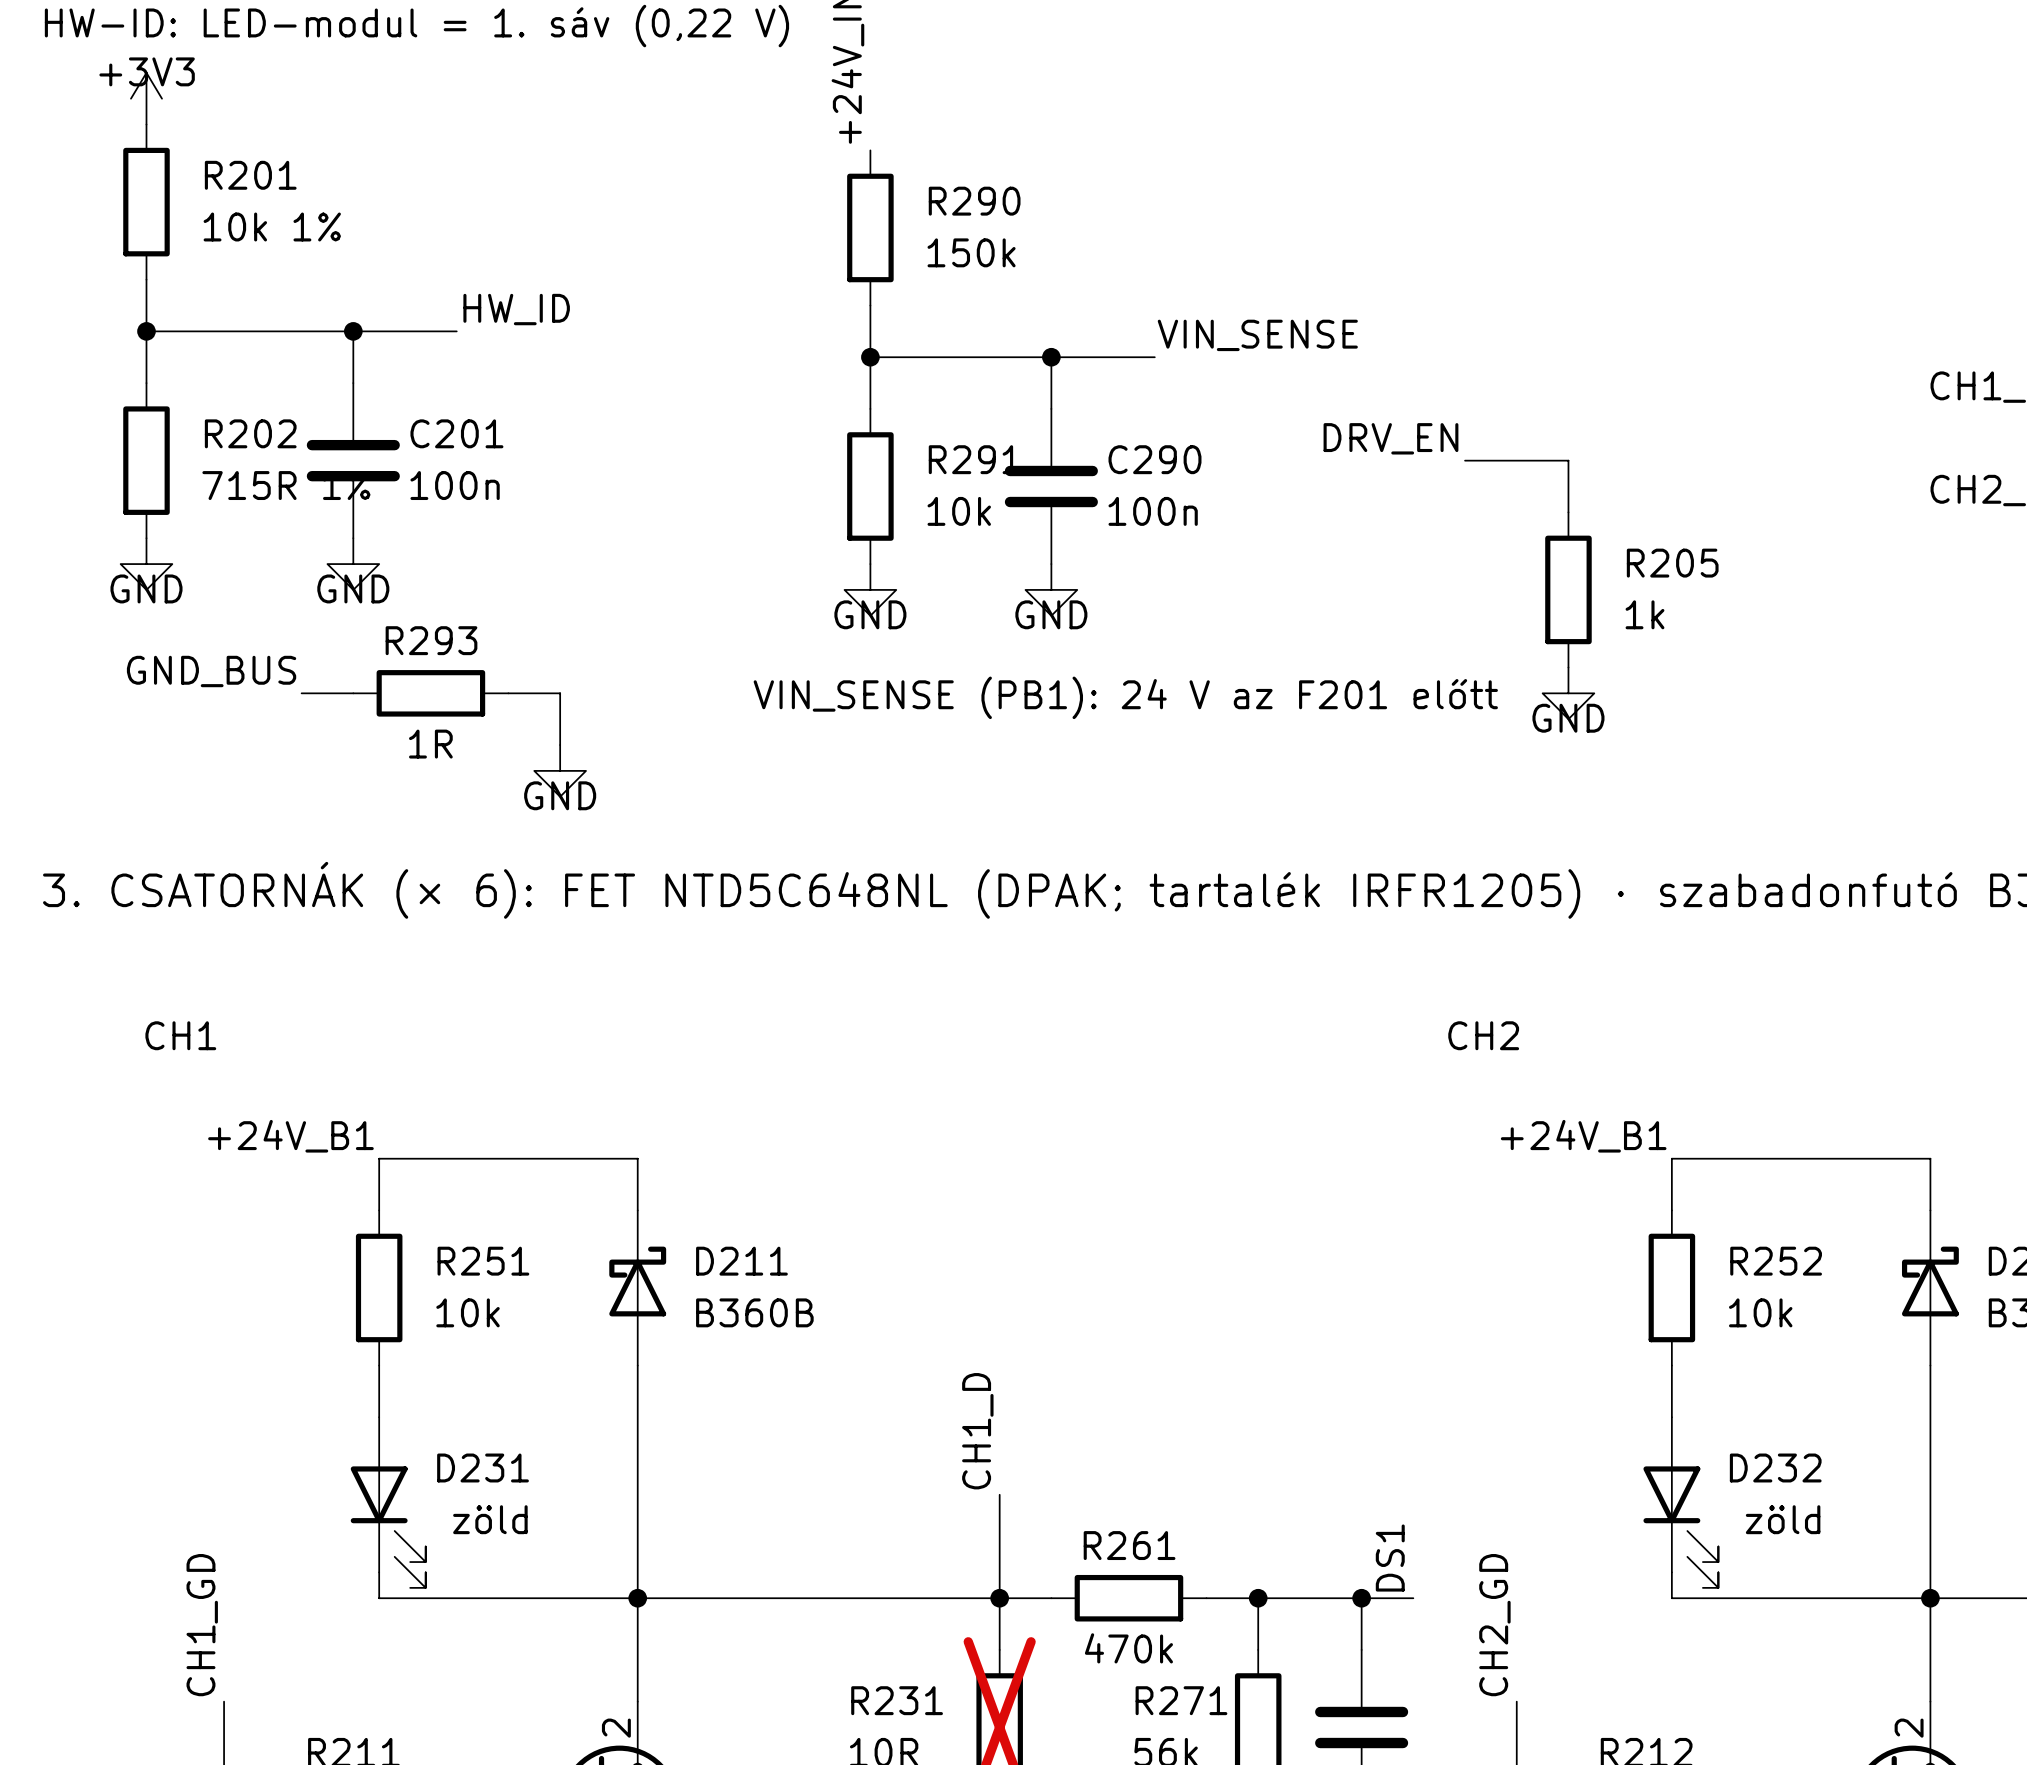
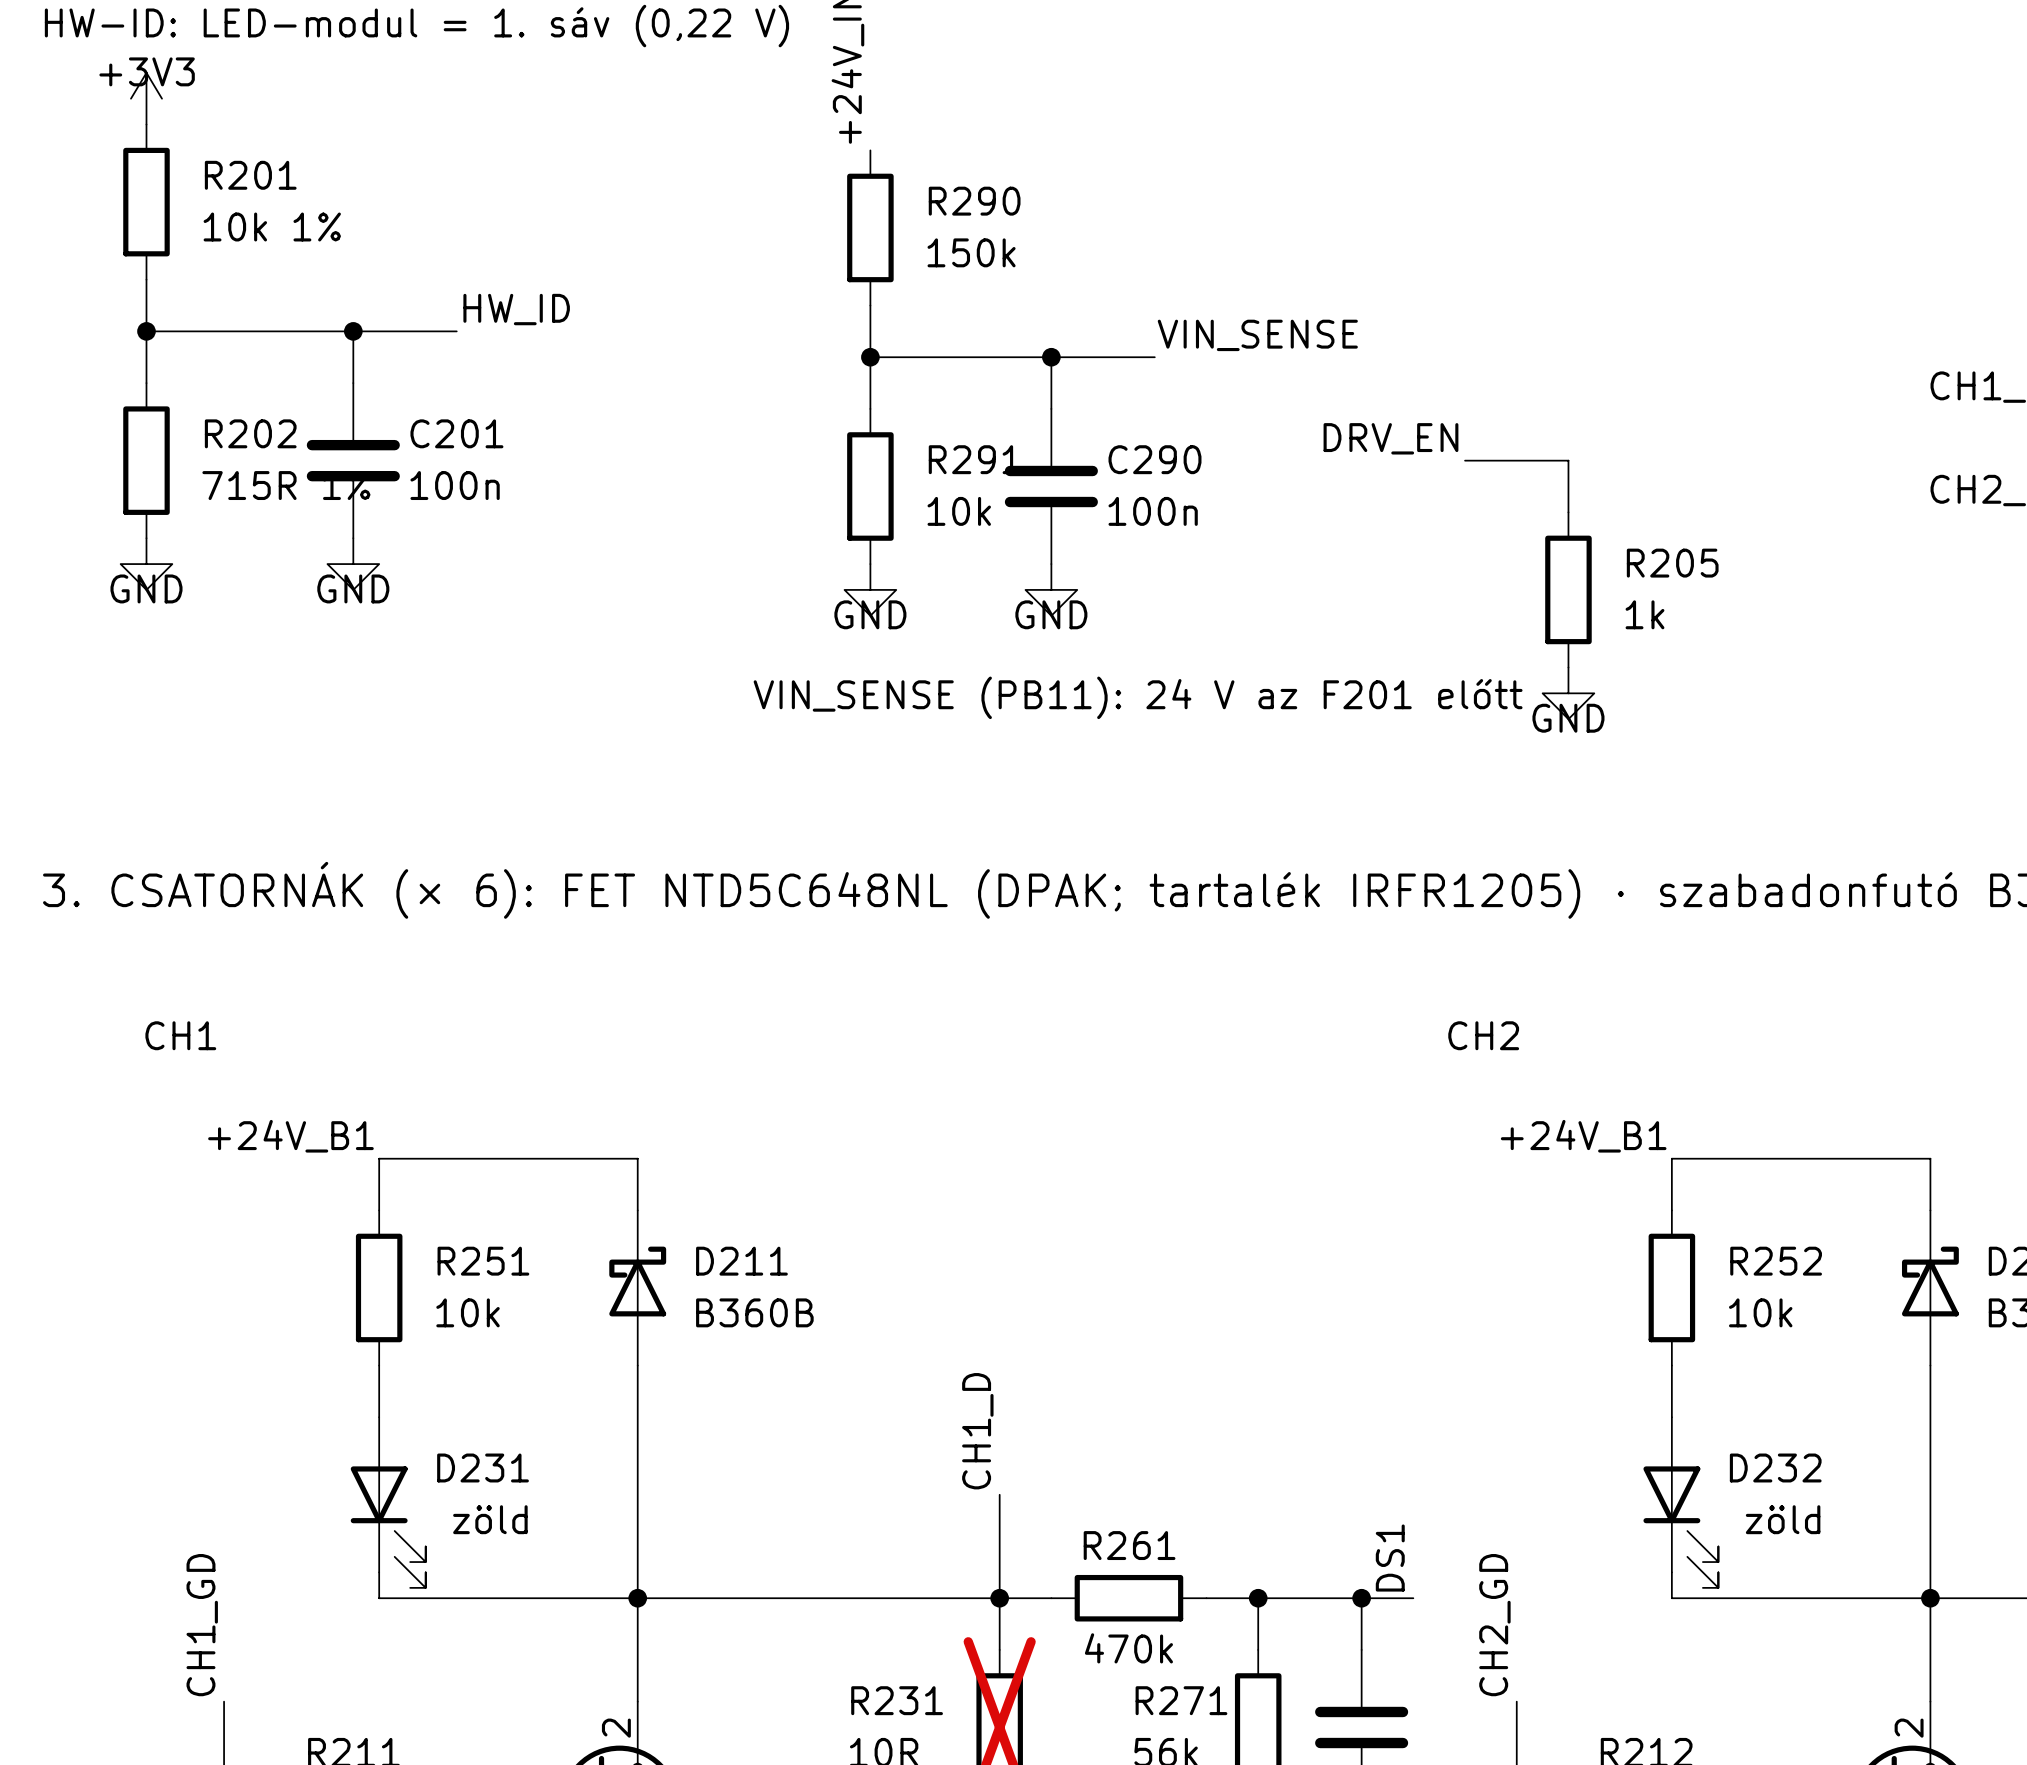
label: GND_BUS (211, 671) -> none
wire: (301, 693) (353, 693) -> none
R293: 1R (430, 693) -> none
wire: (508, 693) (560, 693) (560, 745) -> none
text: VIN_SENSE (PB1): 24 V az F201 előtt (1125, 697) -> VIN_SENSE (PB11): 24 V az F201 előtt (1138, 697)
power symbol: GND (560, 770) -> none

